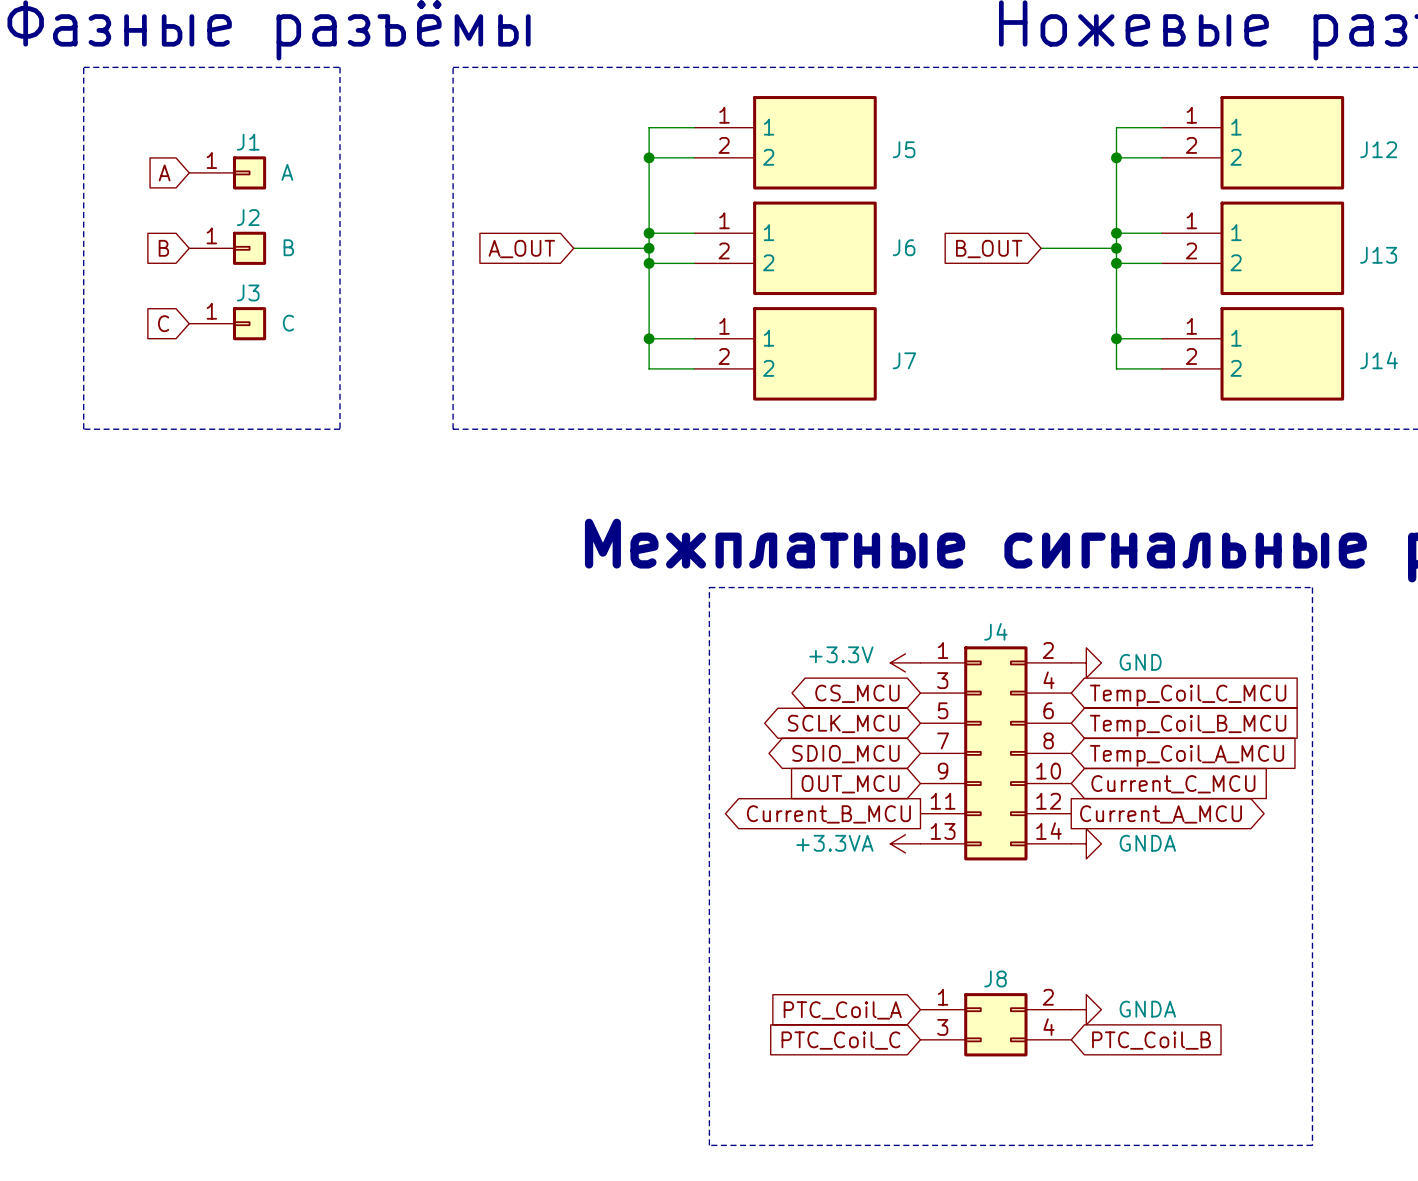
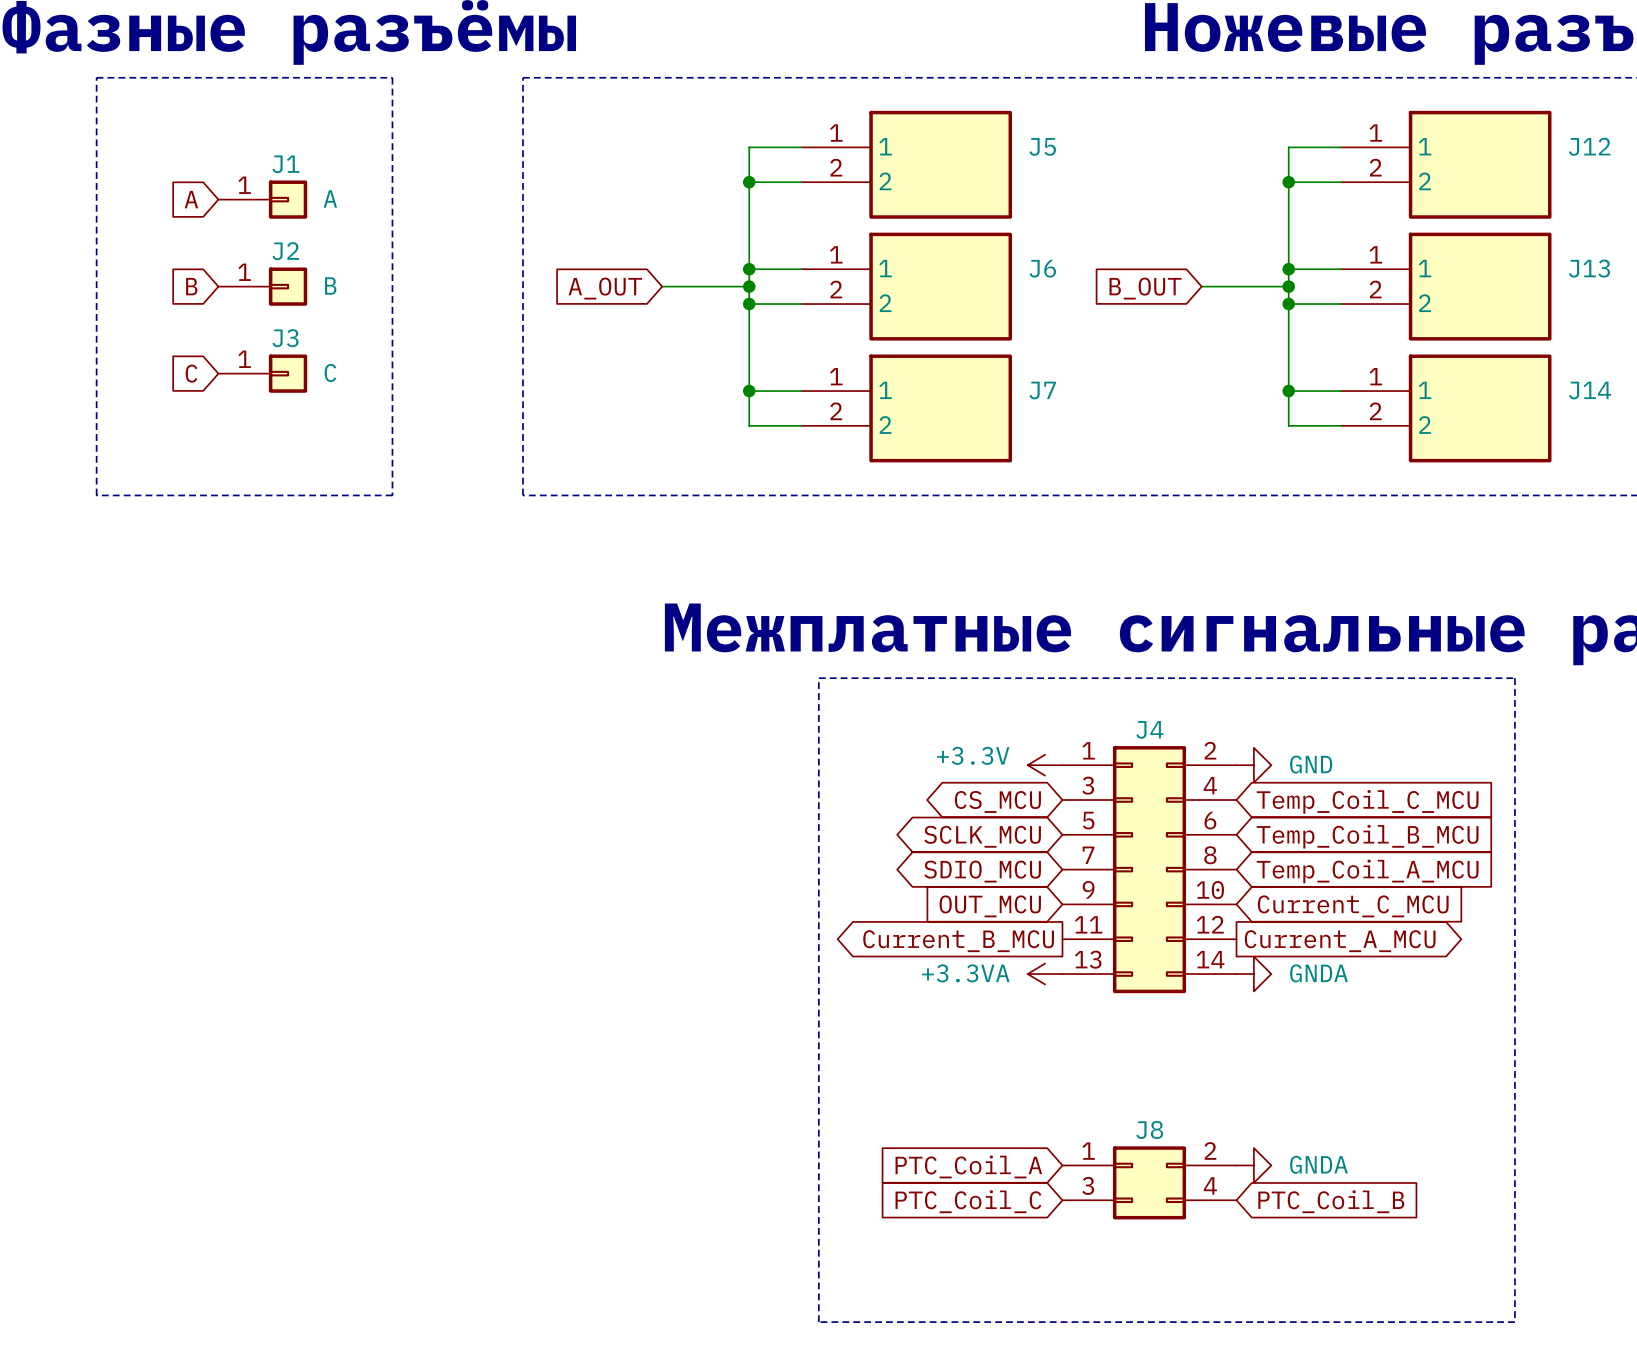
J5 name position: J5 (904, 149) -> J5 (1042, 146)
J12 name position: J12 (1378, 149) -> J12 (1589, 146)
J6 name position: J6 (904, 247) -> J6 (1042, 268)
J13 name position: J13 (1378, 255) -> J13 (1589, 268)
J7 name position: J7 (904, 360) -> J7 (1042, 390)
J14 name position: J14 (1379, 360) -> J14 (1590, 390)

